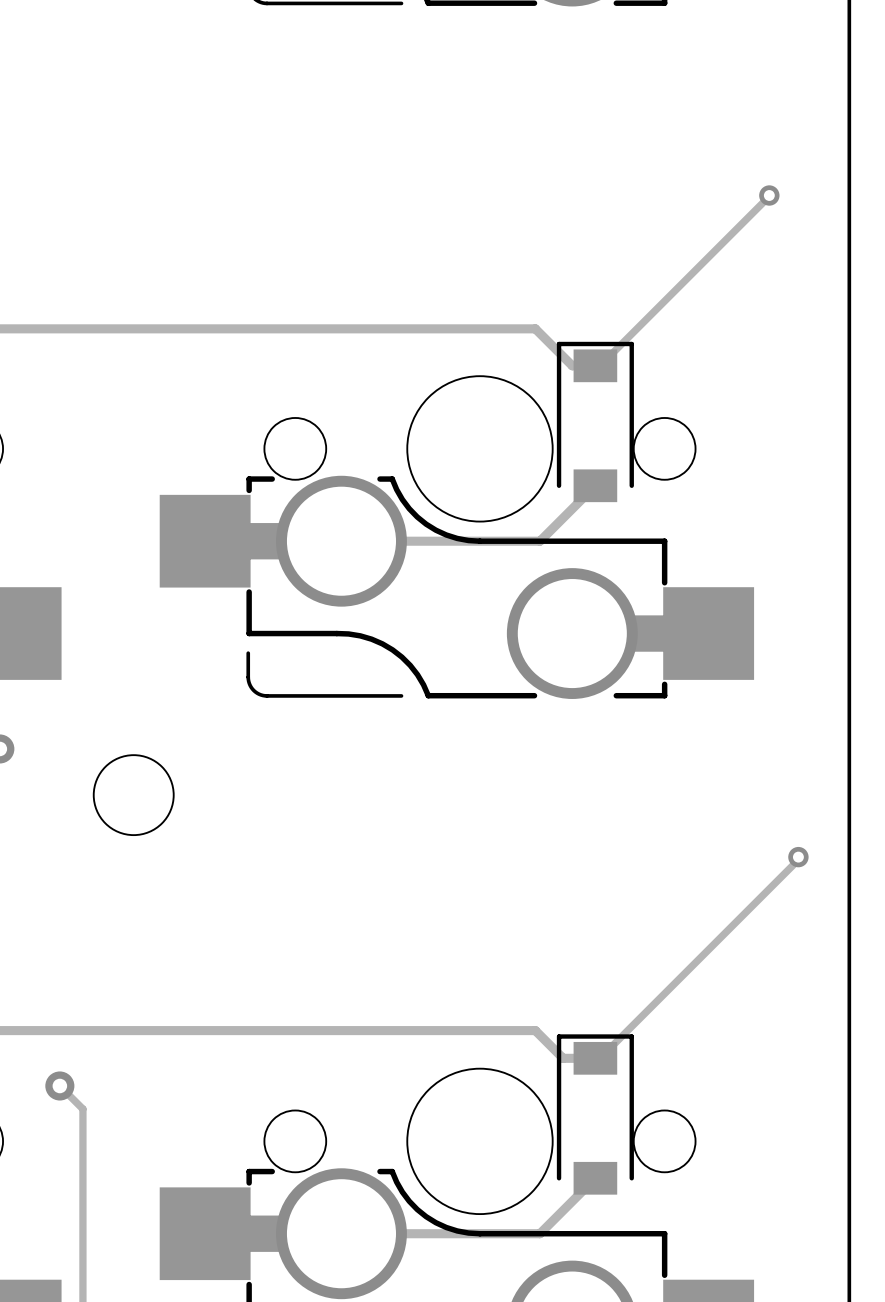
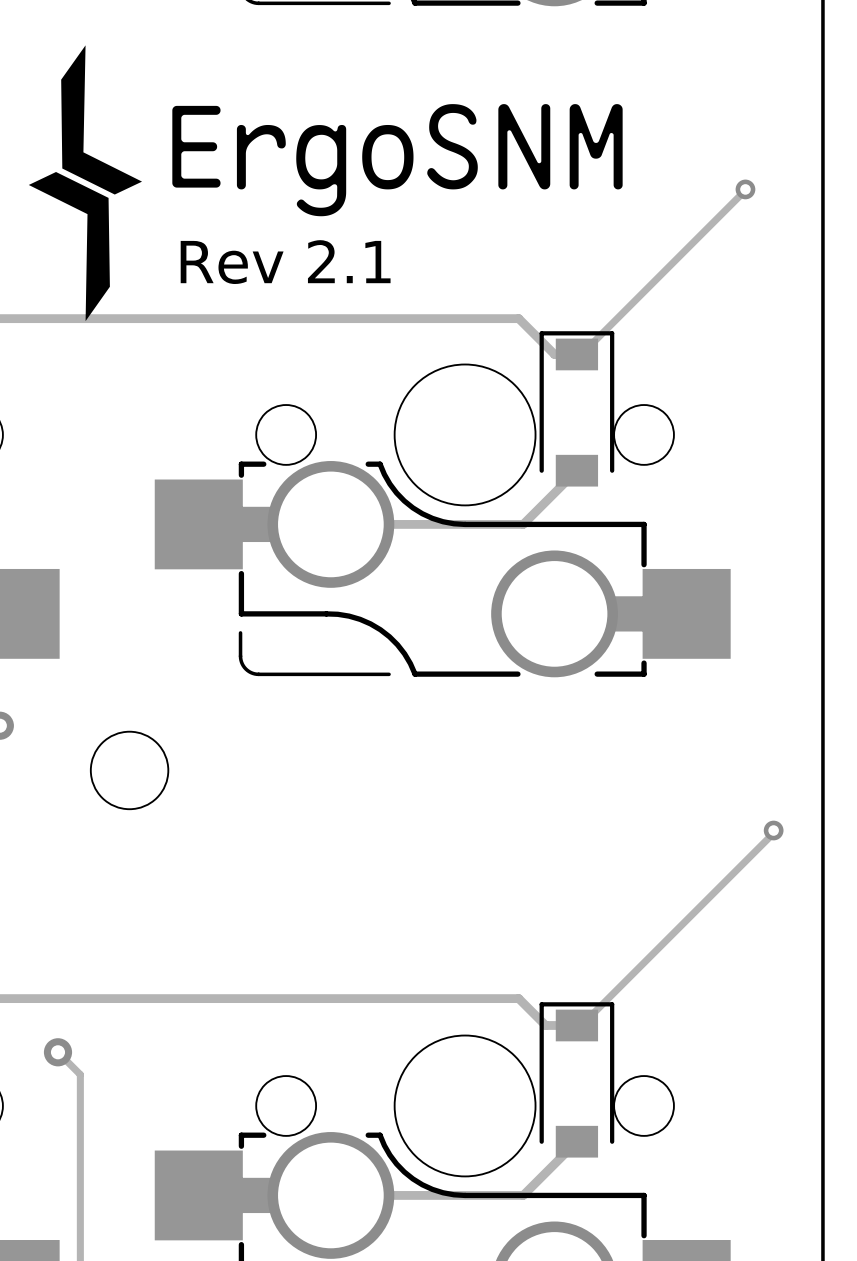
drawing: none -> [28, 45, 623, 322]
text: none -> Rev 2.1 (285, 262)

